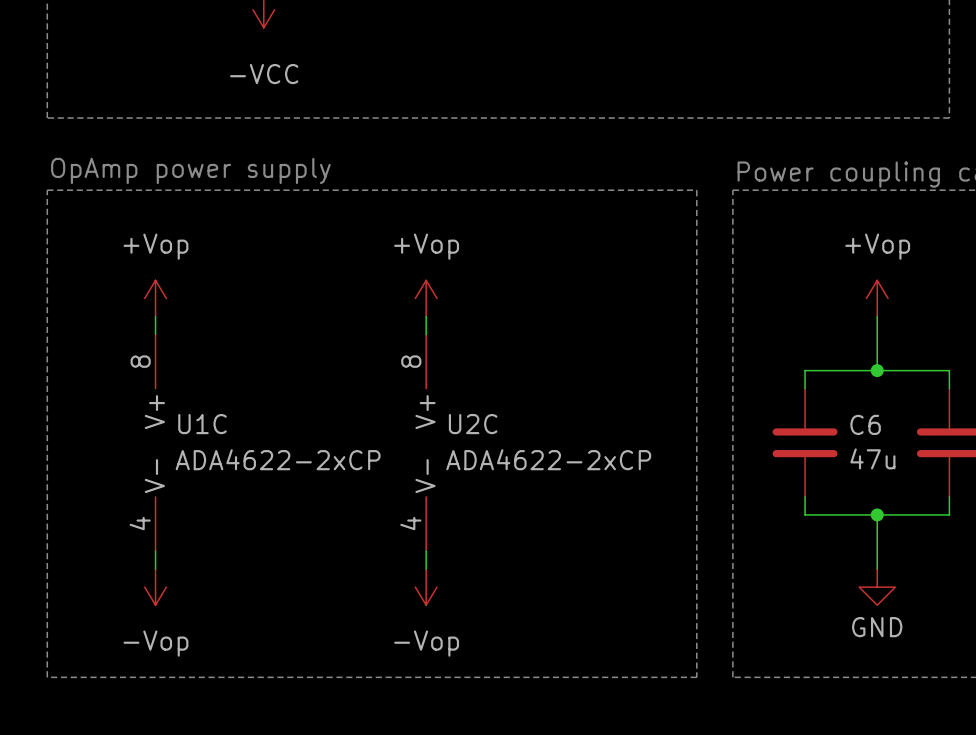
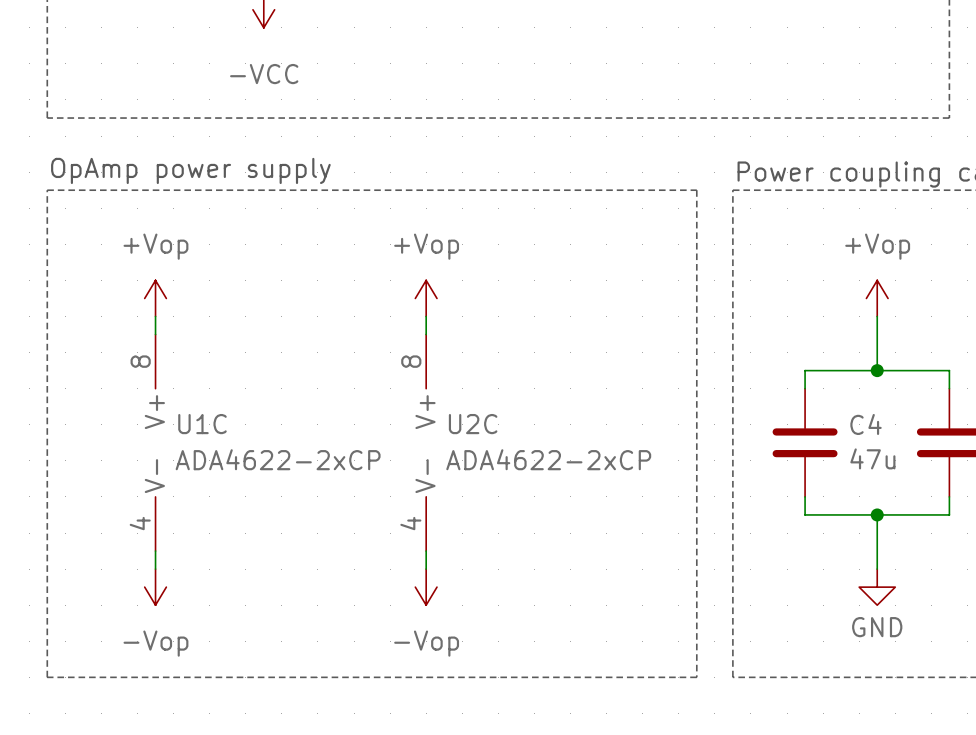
C6 name: C6 (865, 424) -> C4 (866, 424)

